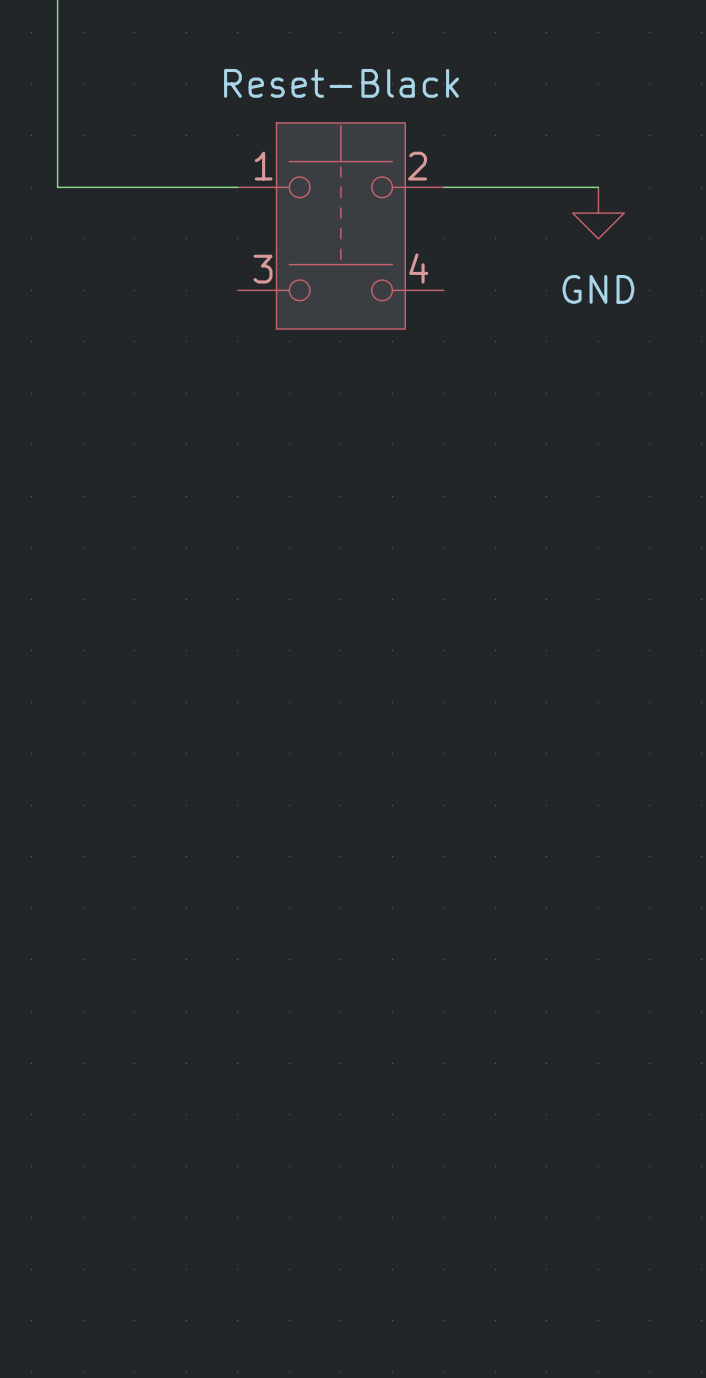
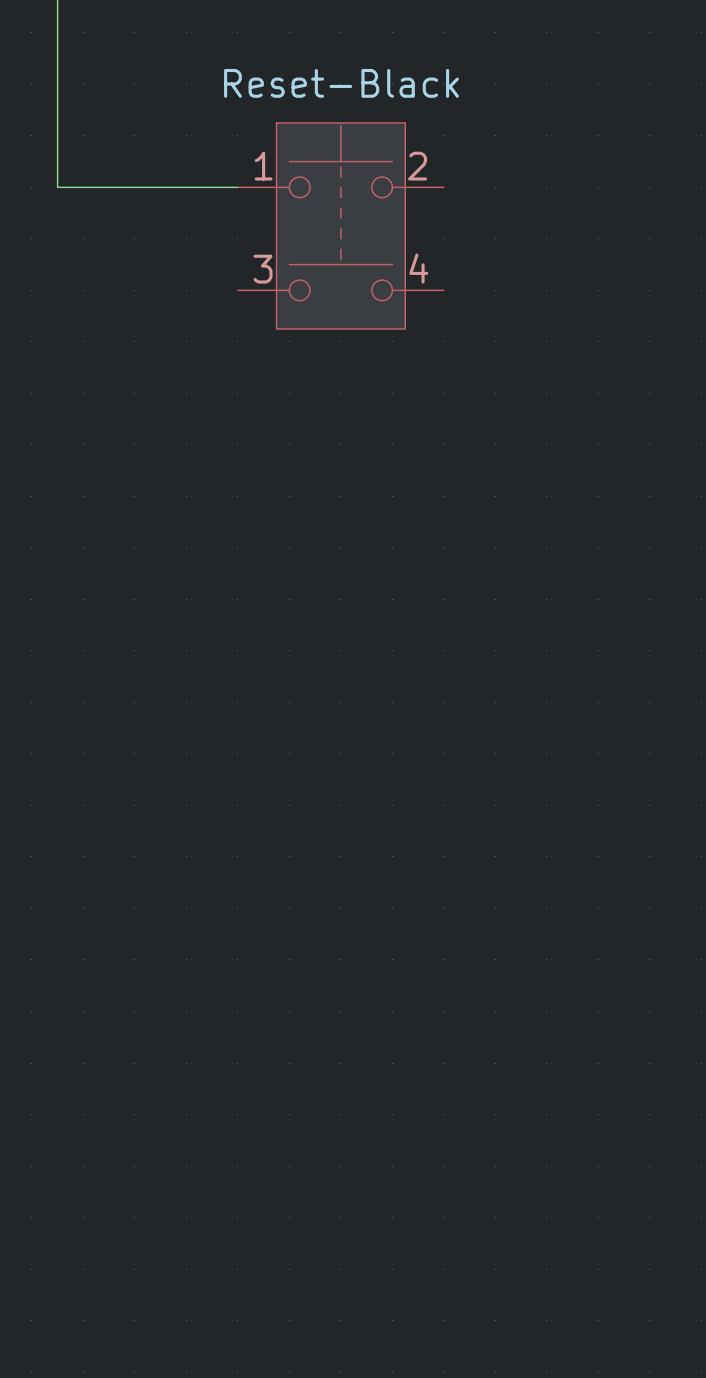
wire: (443, 187) (598, 187) -> none
power symbol: GND (598, 213) -> none

